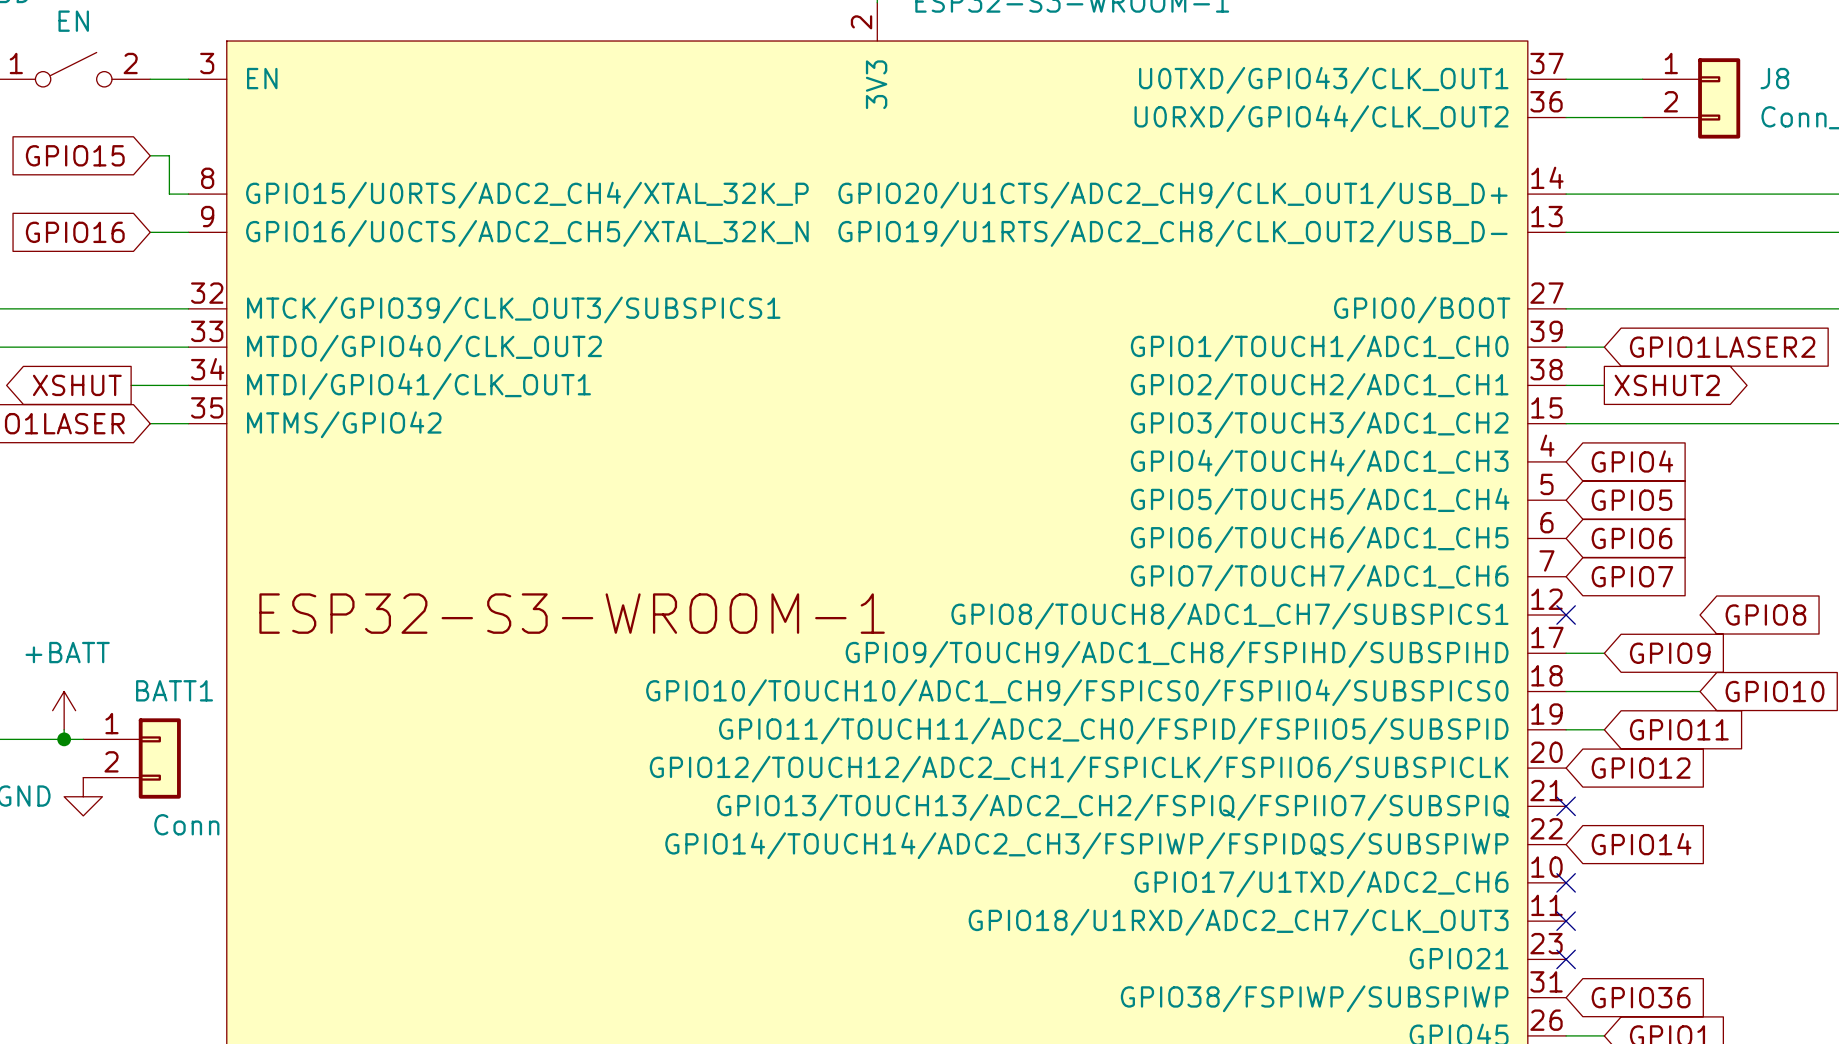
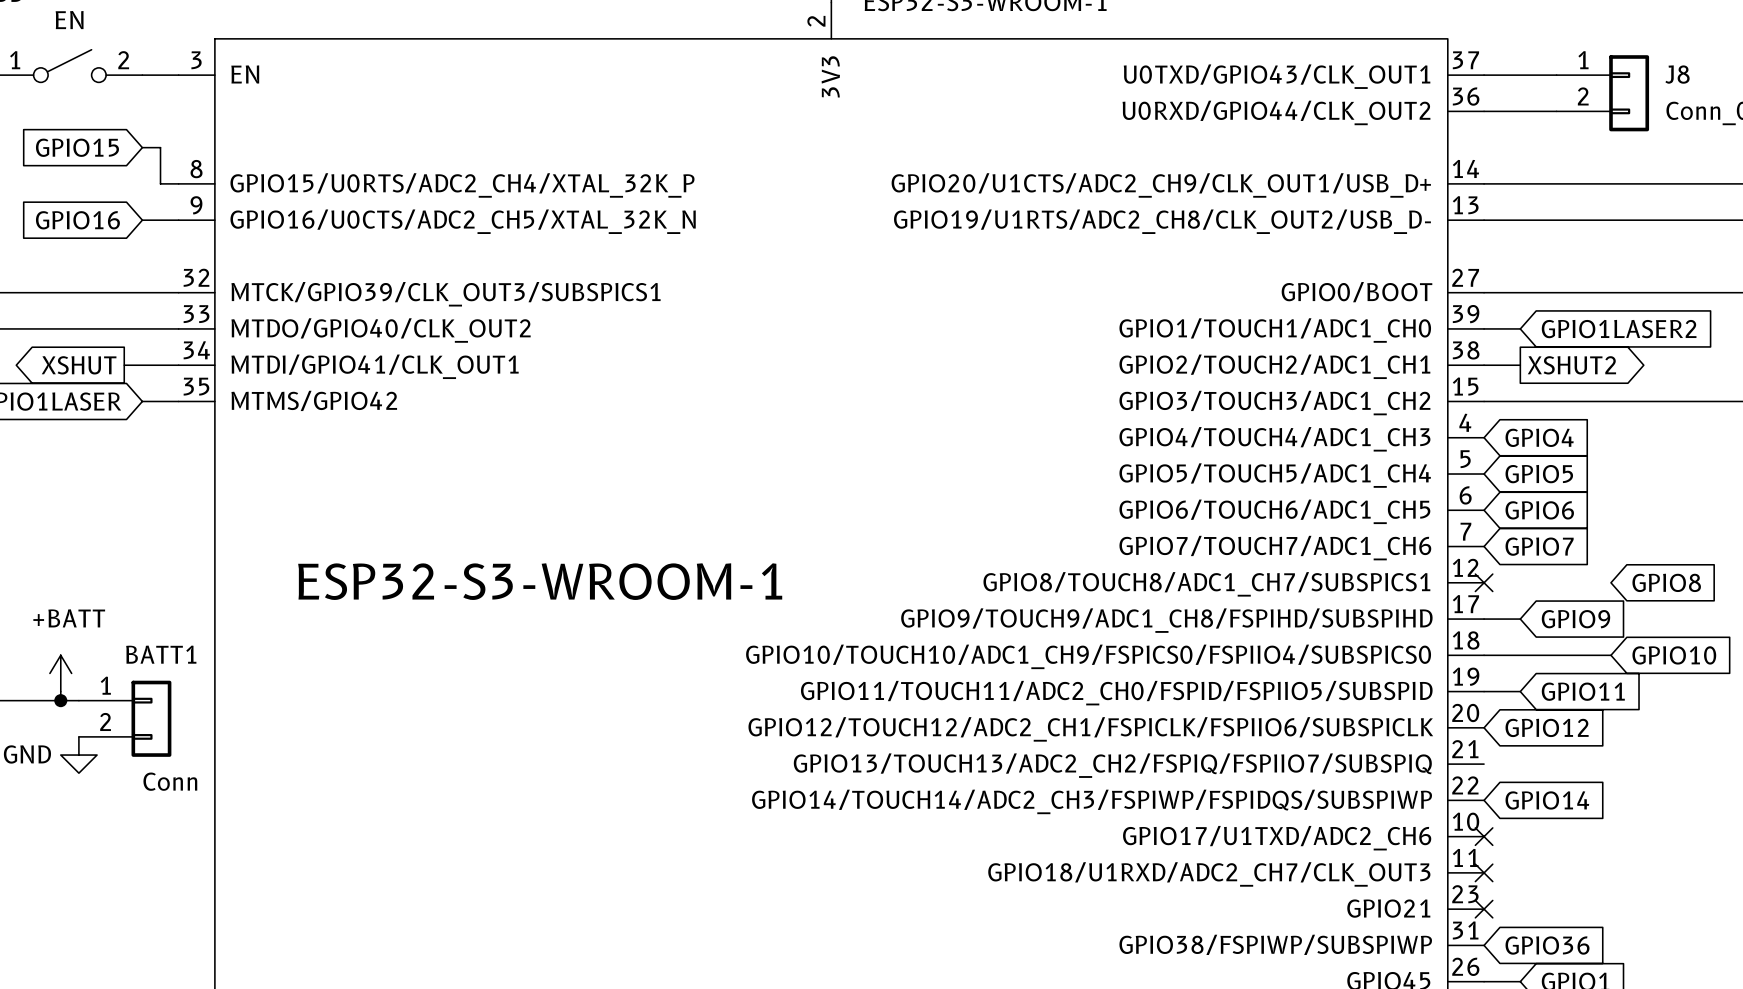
no-connect mark: (1566, 806) -> none

